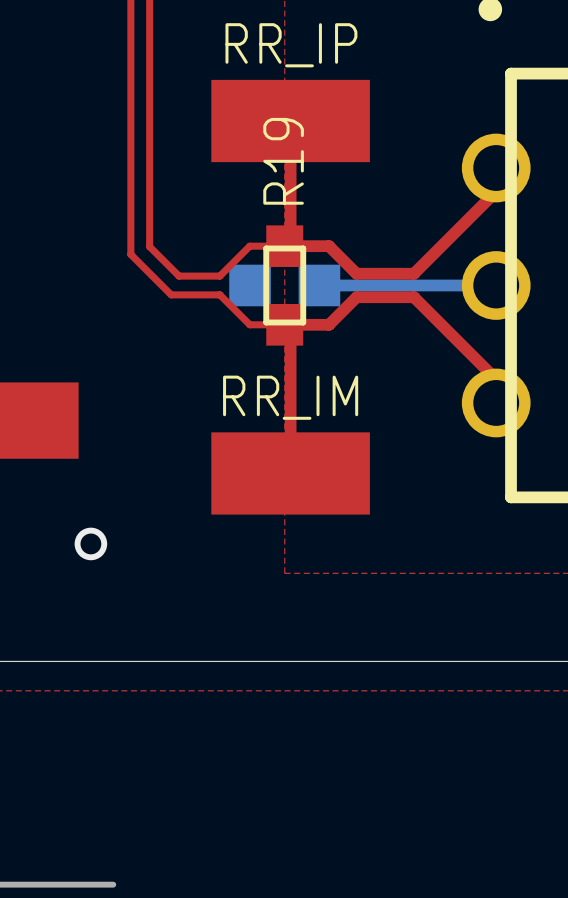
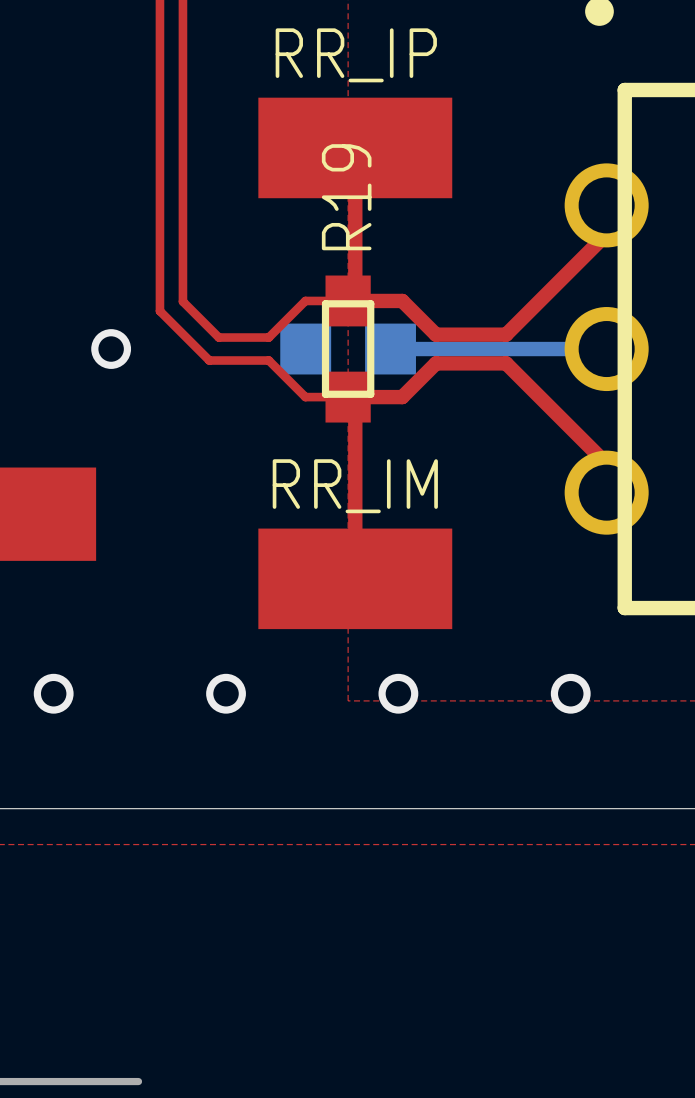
via: none -> (111, 349)
via: (90, 543) -> none
via: none -> (53, 693)
via: none -> (226, 693)
via: none -> (398, 693)
via: none -> (570, 693)

